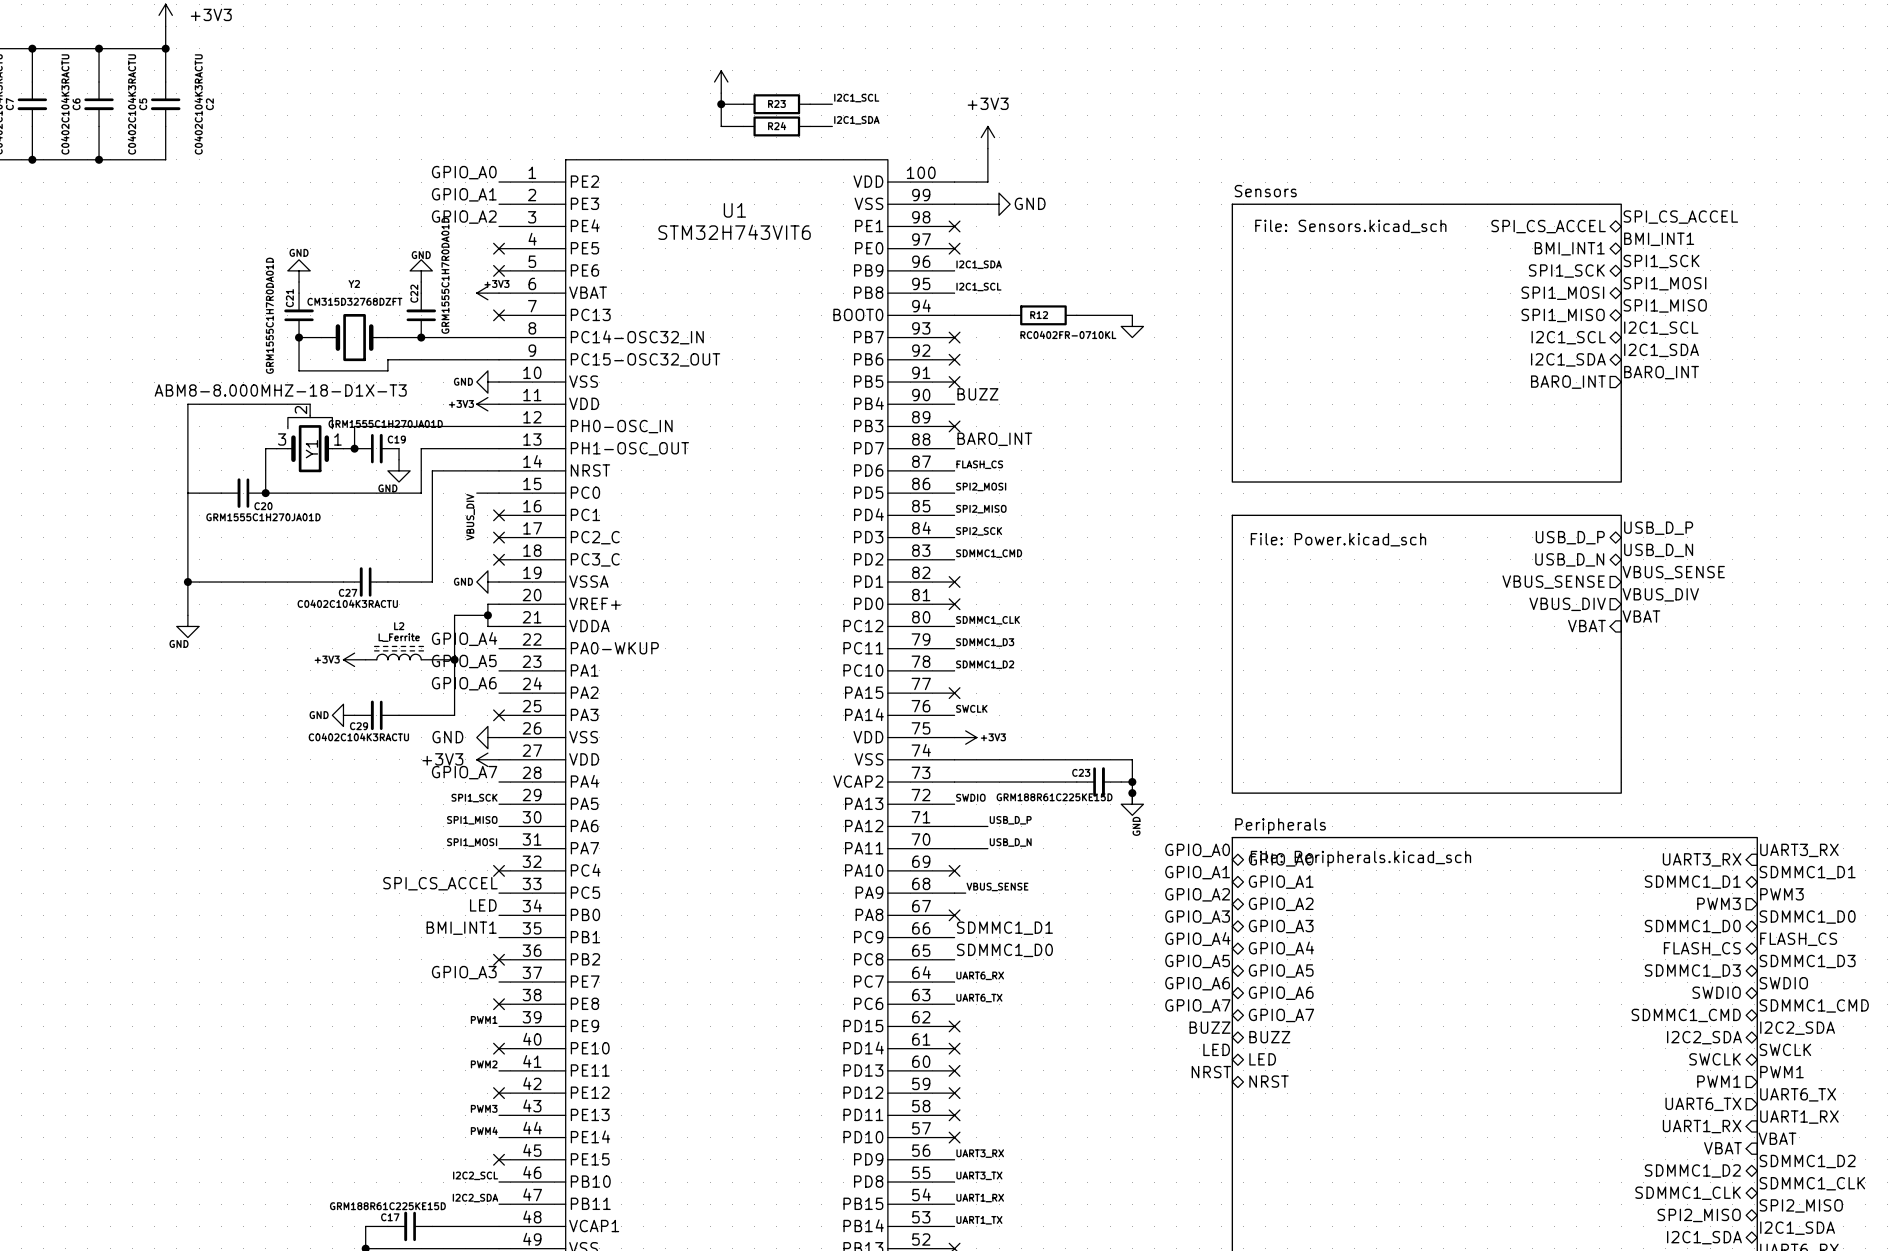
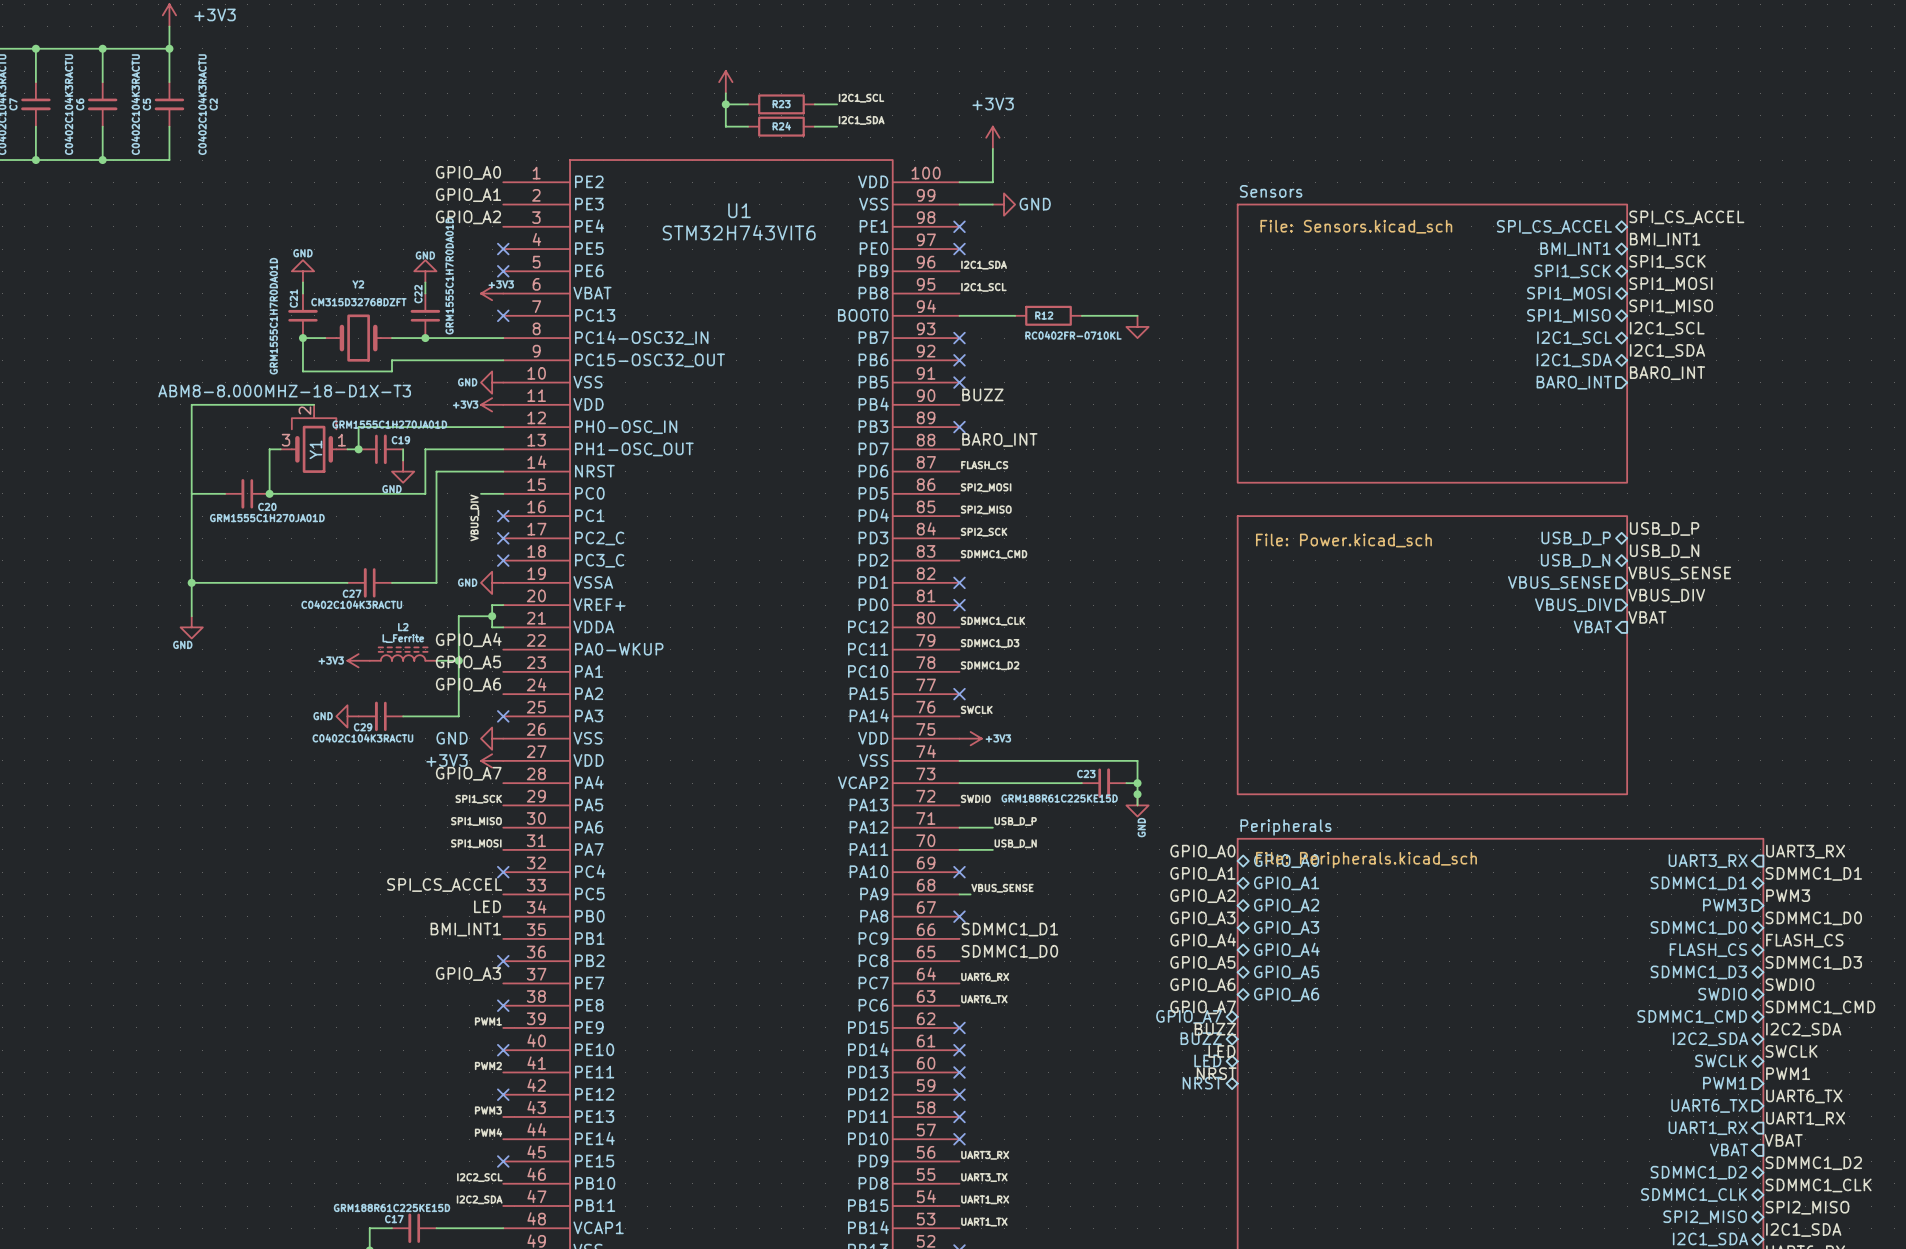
sheet pin rotation: 0° (1281, 1015) -> 180° (1189, 1016)
sheet pin position: GPIO_A7 (1281, 1015) -> GPIO_A7 (1189, 1016)
sheet pin rotation: 0° (1269, 1037) -> 180° (1201, 1038)
sheet pin position: BUZZ (1269, 1037) -> BUZZ (1201, 1038)
sheet pin rotation: 0° (1262, 1059) -> 180° (1207, 1060)
sheet pin position: LED (1262, 1059) -> LED (1207, 1060)
sheet pin rotation: 0° (1269, 1081) -> 180° (1202, 1083)
sheet pin position: NRST (1269, 1081) -> NRST (1202, 1083)

